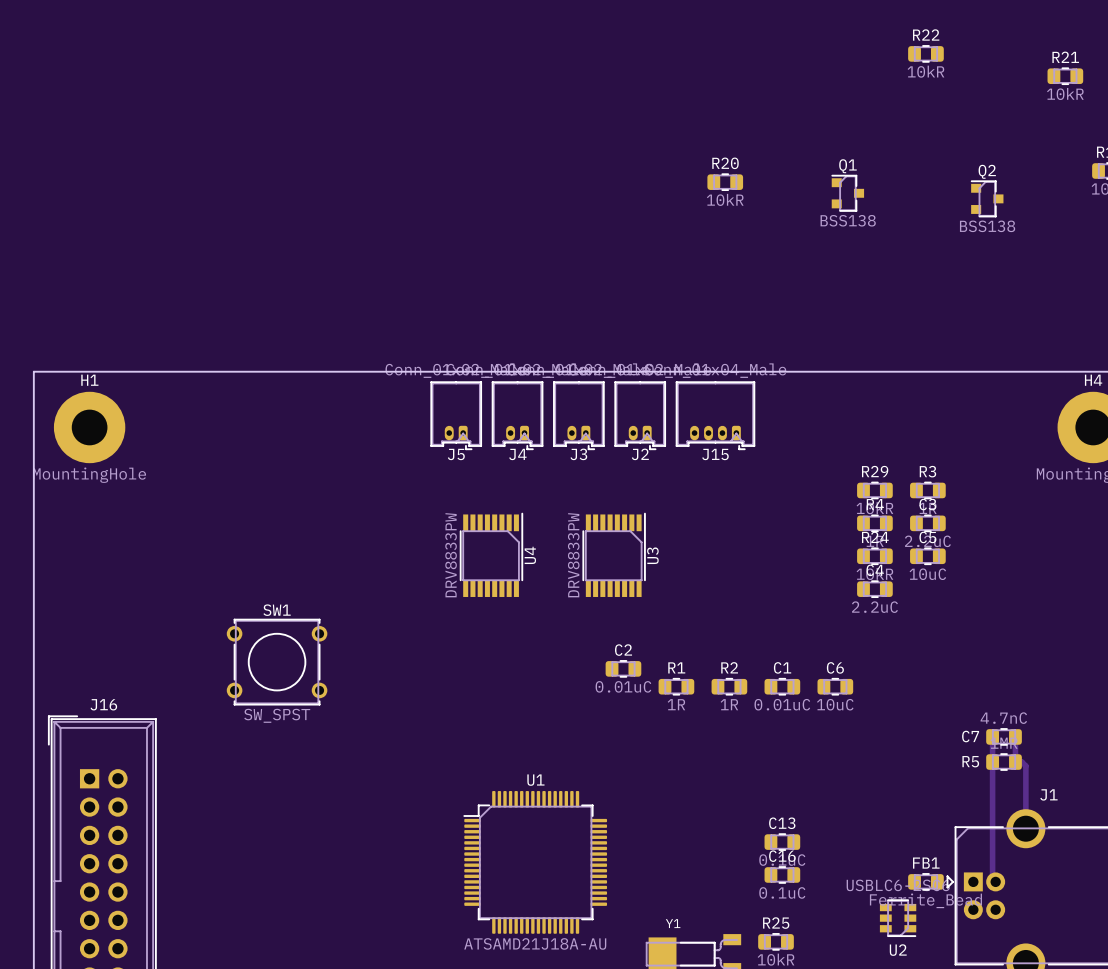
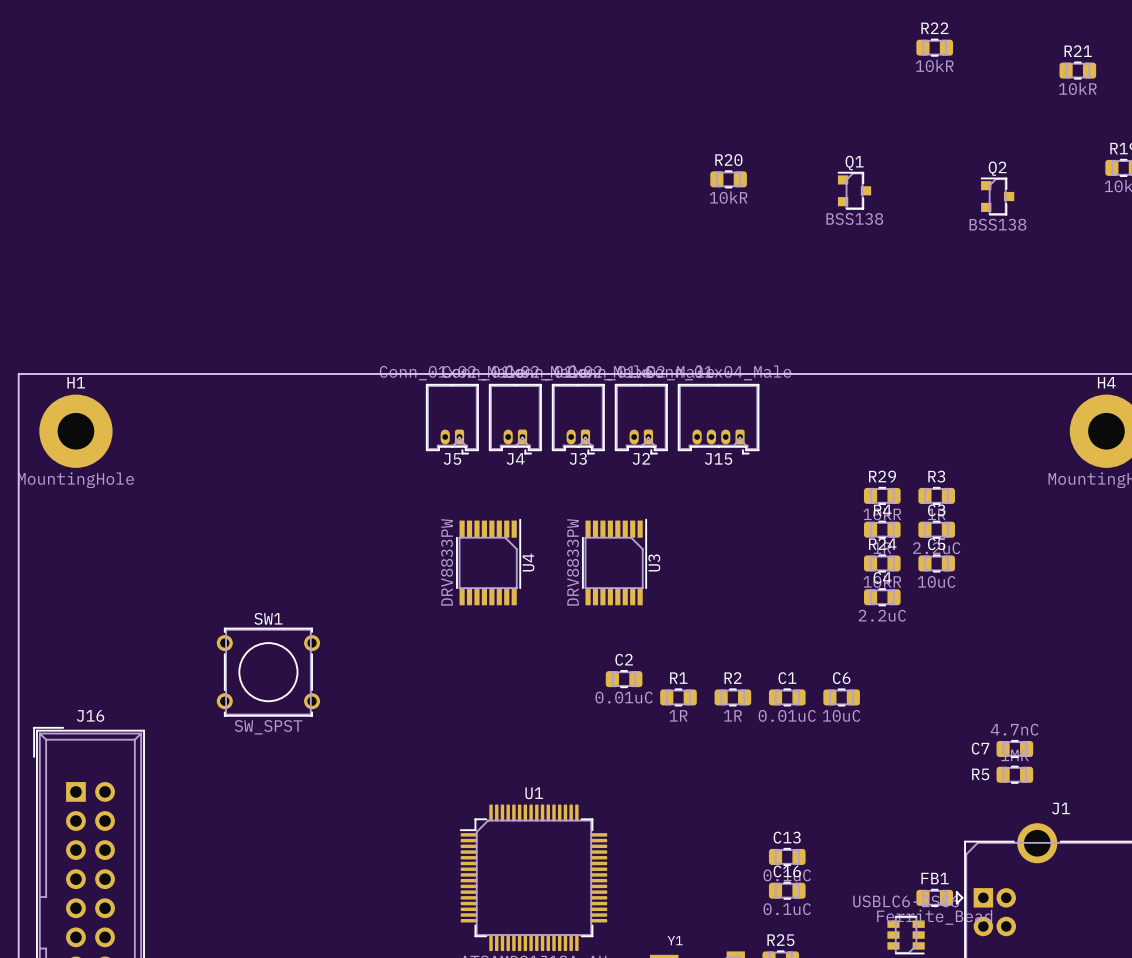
track: (992, 736) (992, 878) (995, 881) -> none
track: (1015, 736) (1015, 762) (1021, 762) (1025, 766) (1025, 828) -> none

